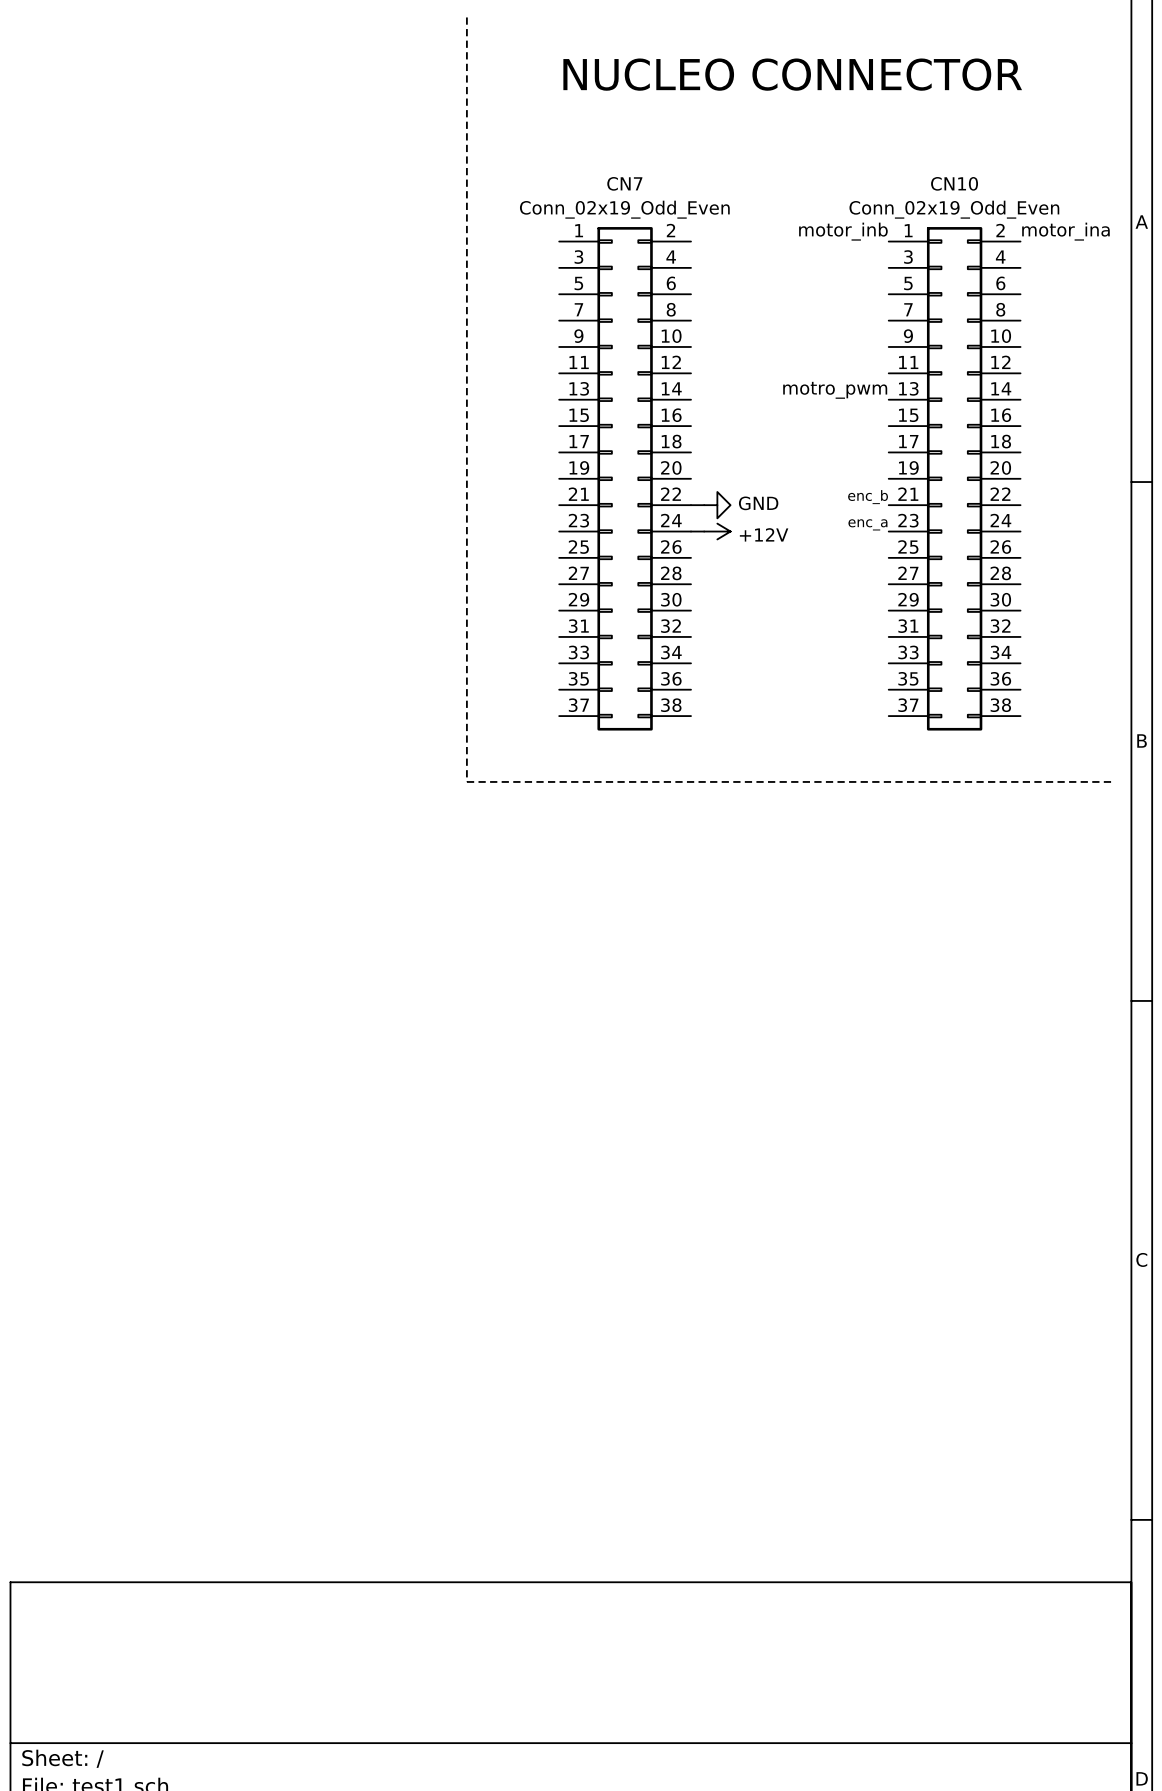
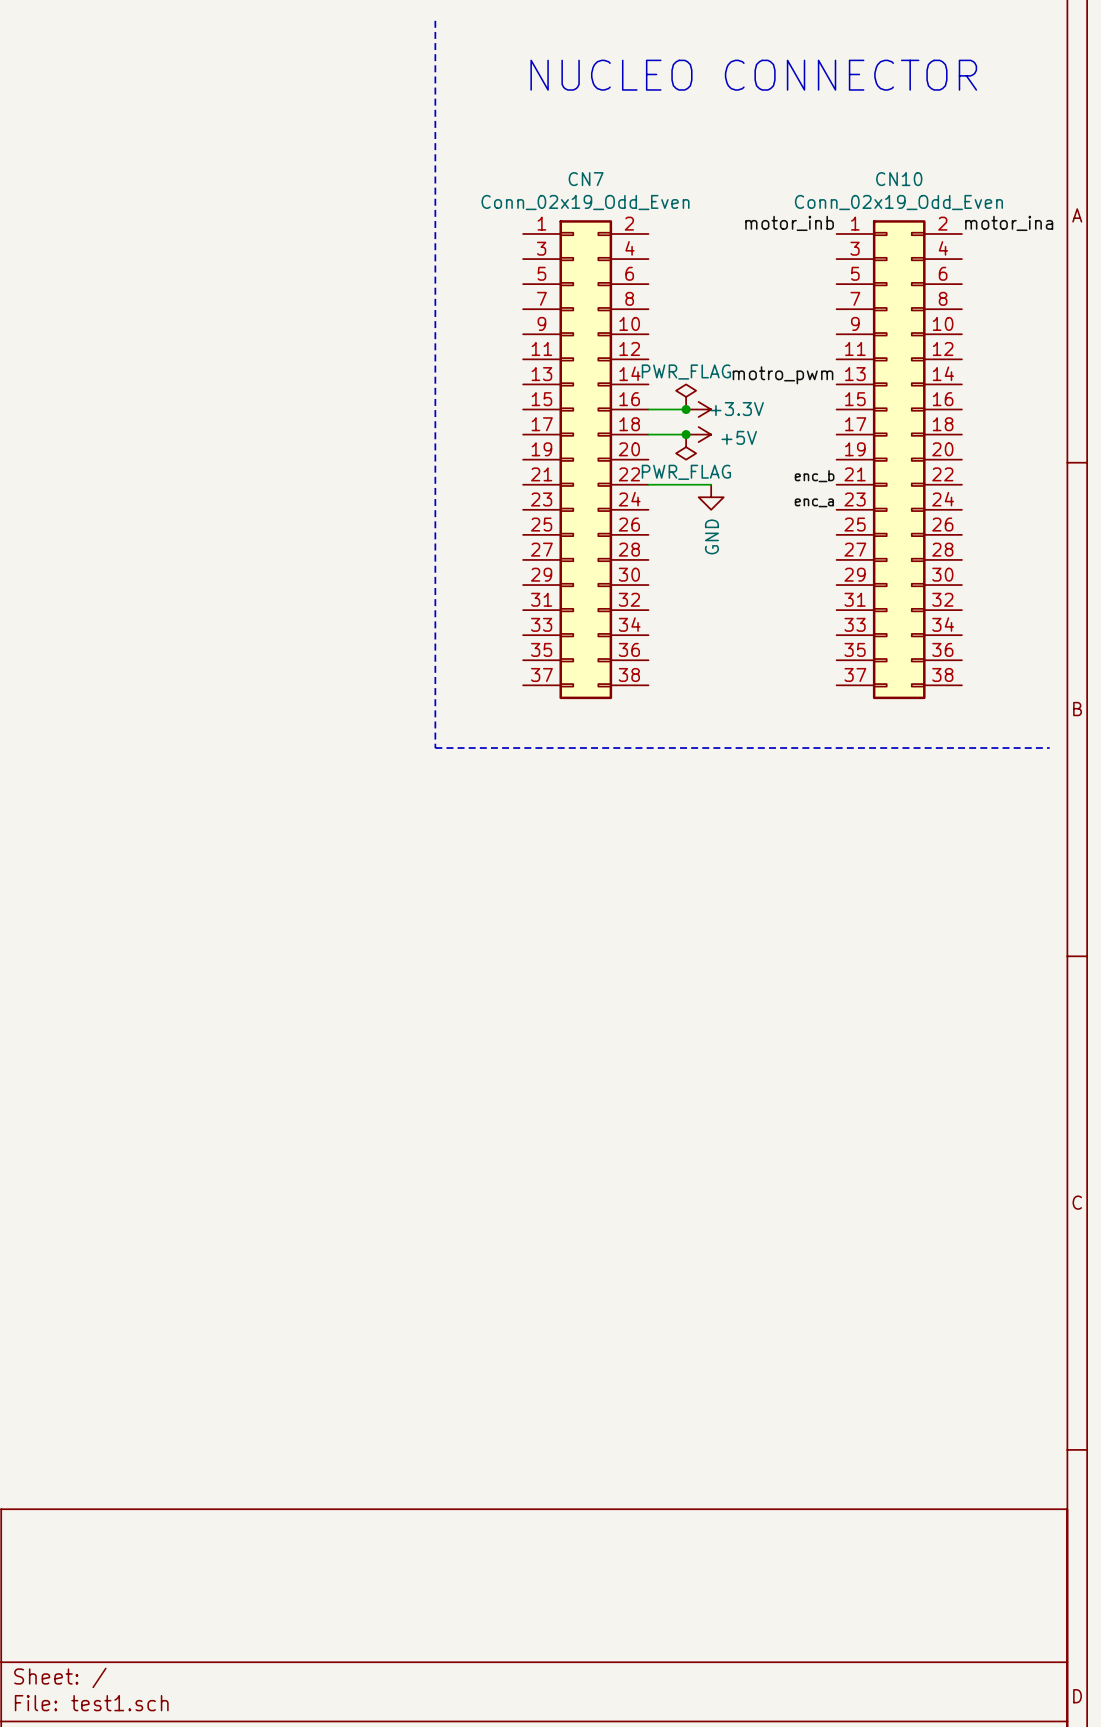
power symbol: none -> PWR_FLAG (686, 396)
wire: none -> (648, 409) (686, 409)
junction: none -> (686, 409)
power symbol: none -> +3.3V (698, 409)
wire: none -> (648, 434) (686, 434)
junction: none -> (686, 434)
power symbol: none -> +5V (698, 434)
power symbol: none -> PWR_FLAG (686, 447)
wire: none -> (661, 484) (711, 484)
power symbol rotation: 0° (717, 505) -> 90° clockwise (711, 497)
power symbol position: GND (717, 505) -> GND (711, 497)
wire: (691, 531) (704, 531) -> none
power symbol: +12V (717, 531) -> none

